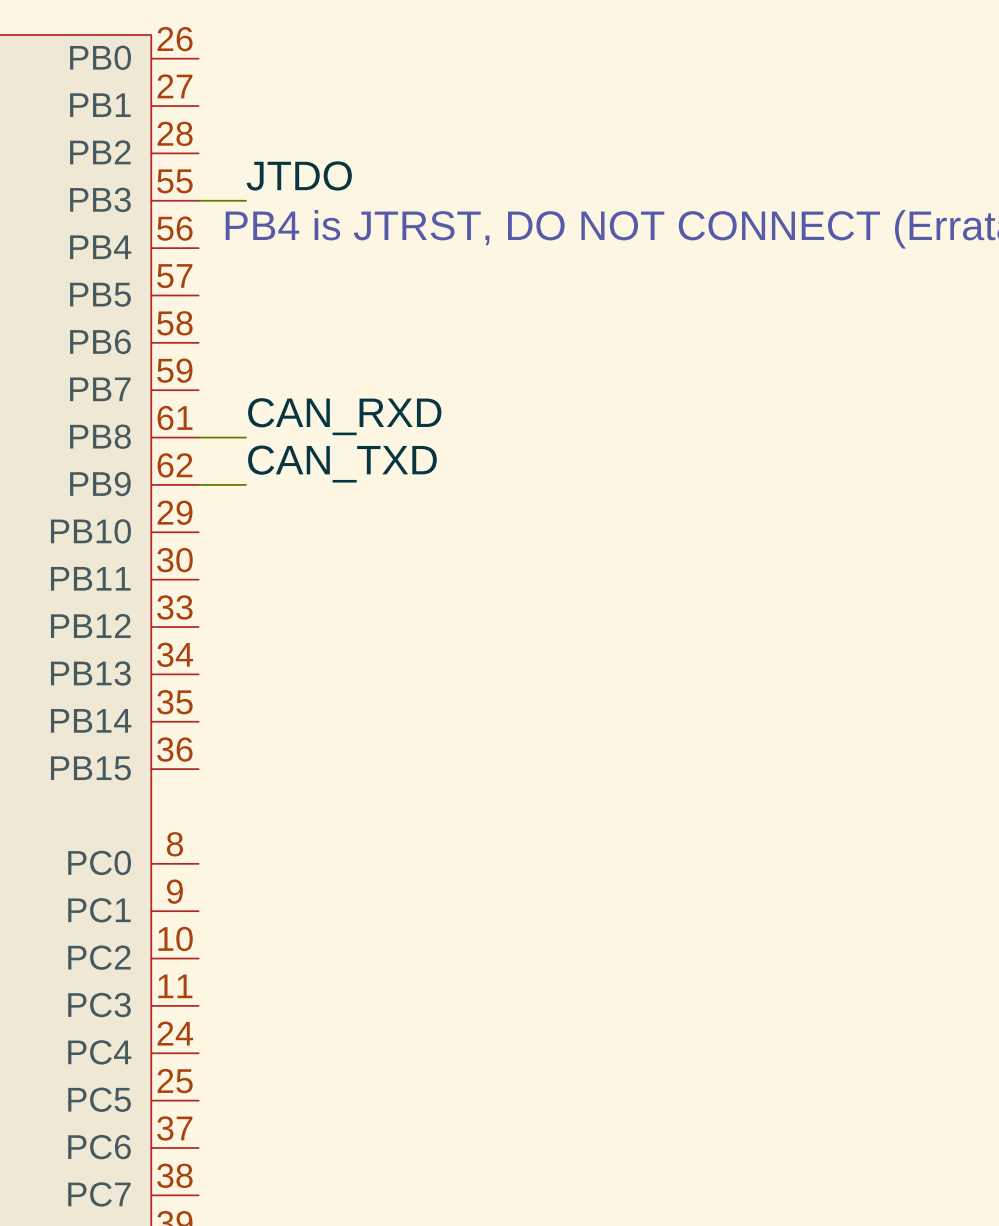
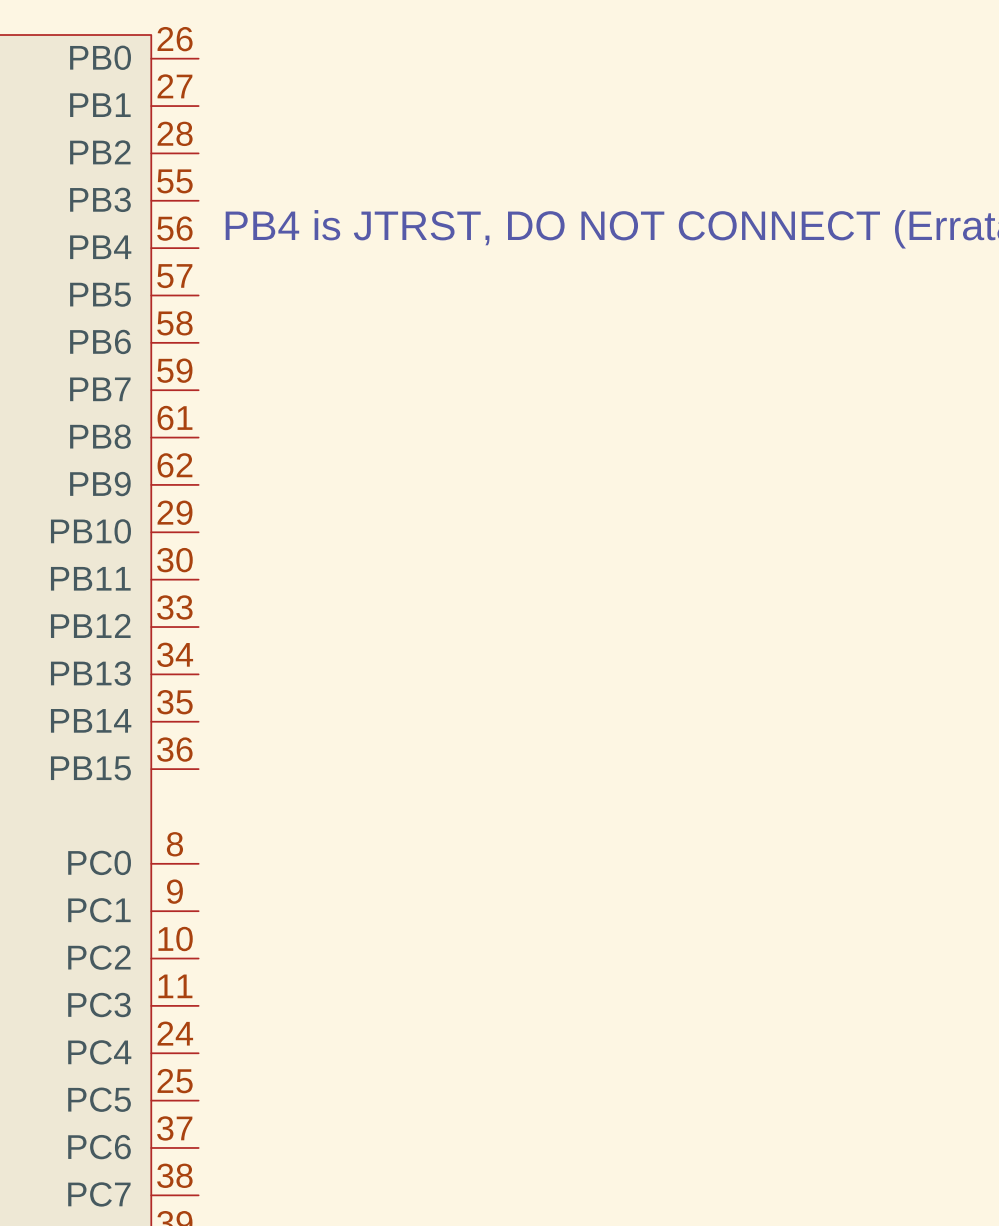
label: JTDO (299, 175) -> none
wire: (198, 200) (245, 200) -> none
label: CAN_RXD (344, 416) -> none
wire: (198, 437) (245, 437) -> none
label: CAN_TXD (342, 464) -> none
wire: (198, 484) (245, 484) -> none

